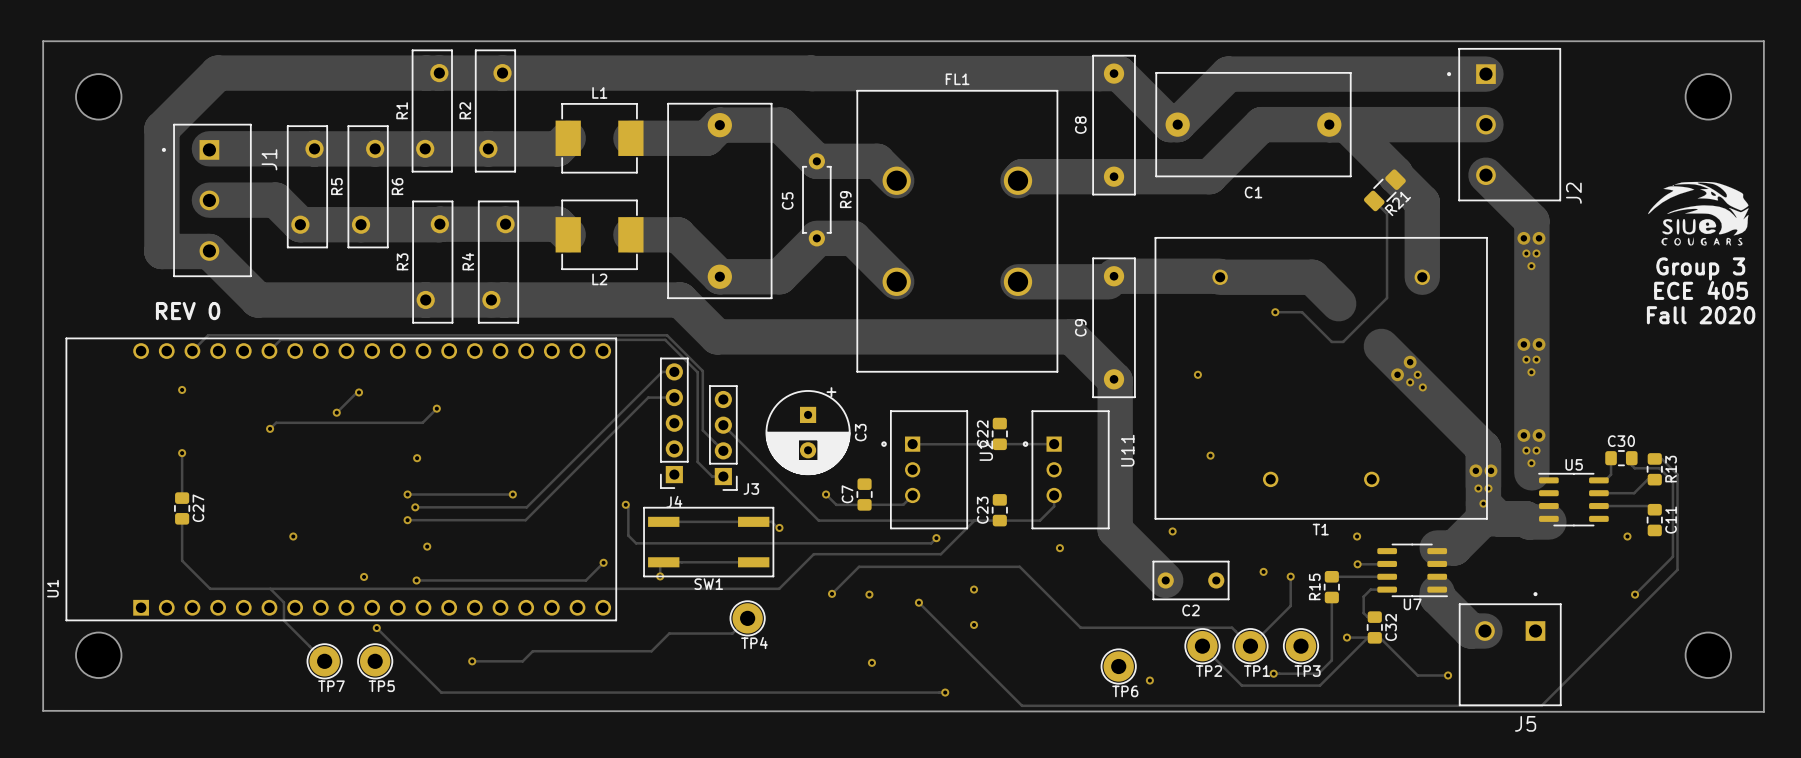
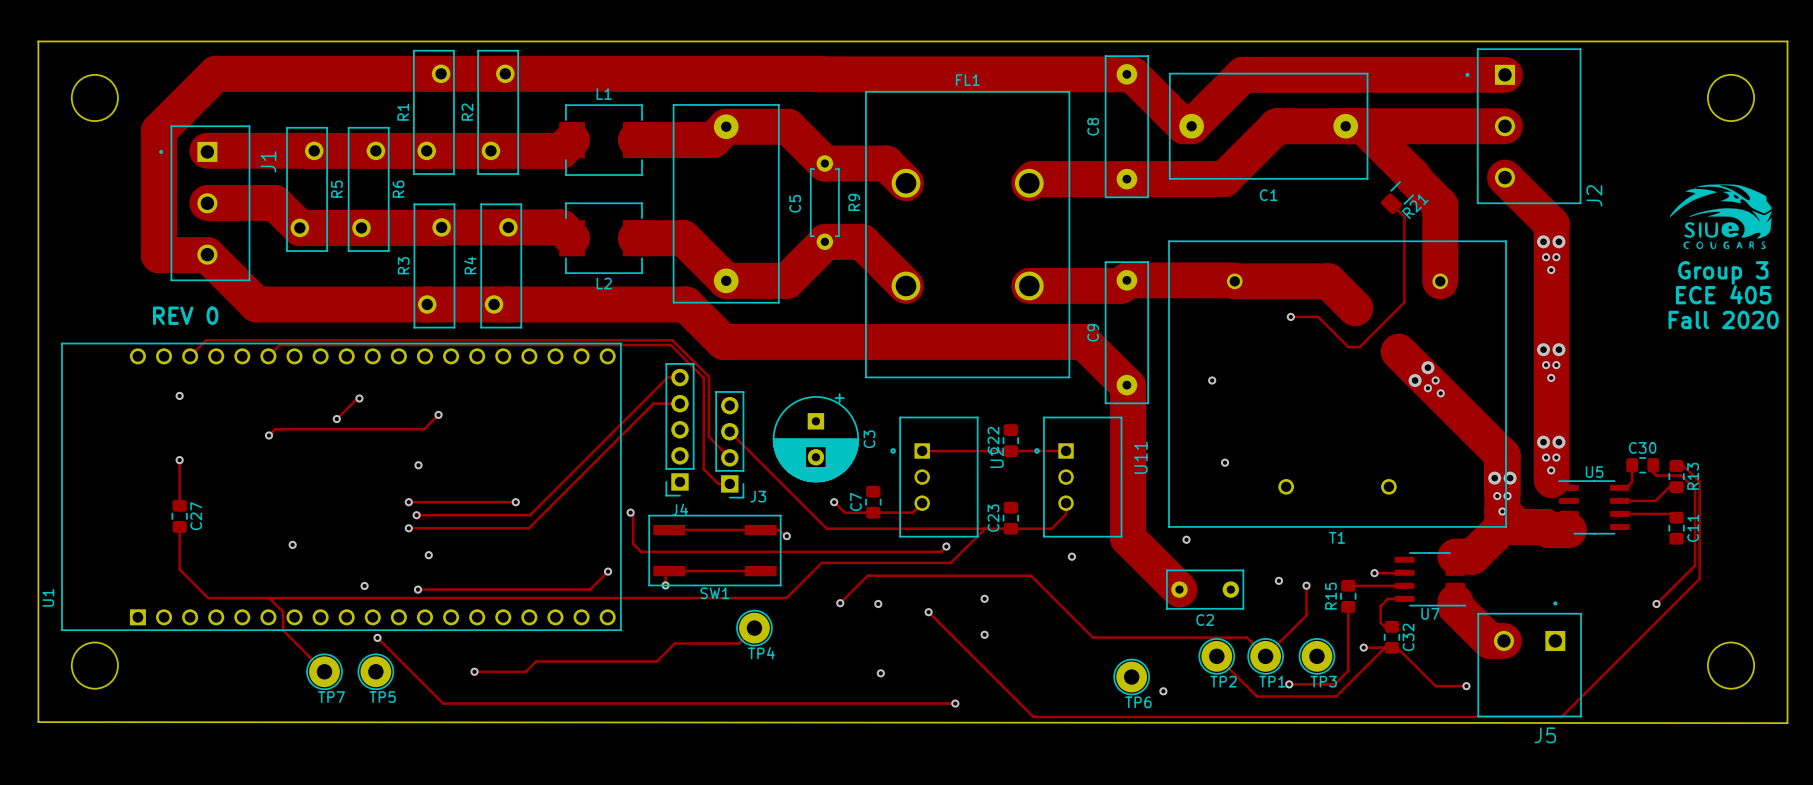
via: (1357, 536) -> none
via: (1627, 536) -> none

